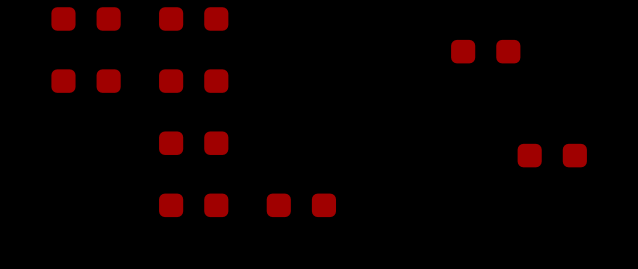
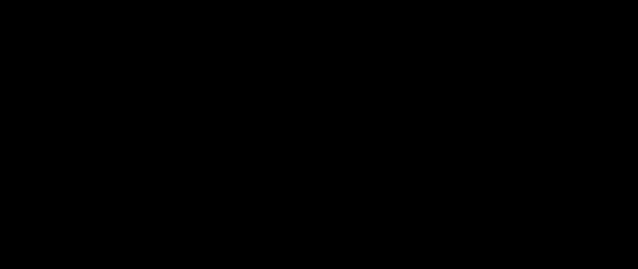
part: (86, 18) -> none
part: (193, 18) -> none
part: (485, 51) -> none
part: (86, 81) -> none
part: (193, 81) -> none
part: (193, 143) -> none
part: (552, 155) -> none
part: (193, 205) -> none
part: (301, 205) -> none

